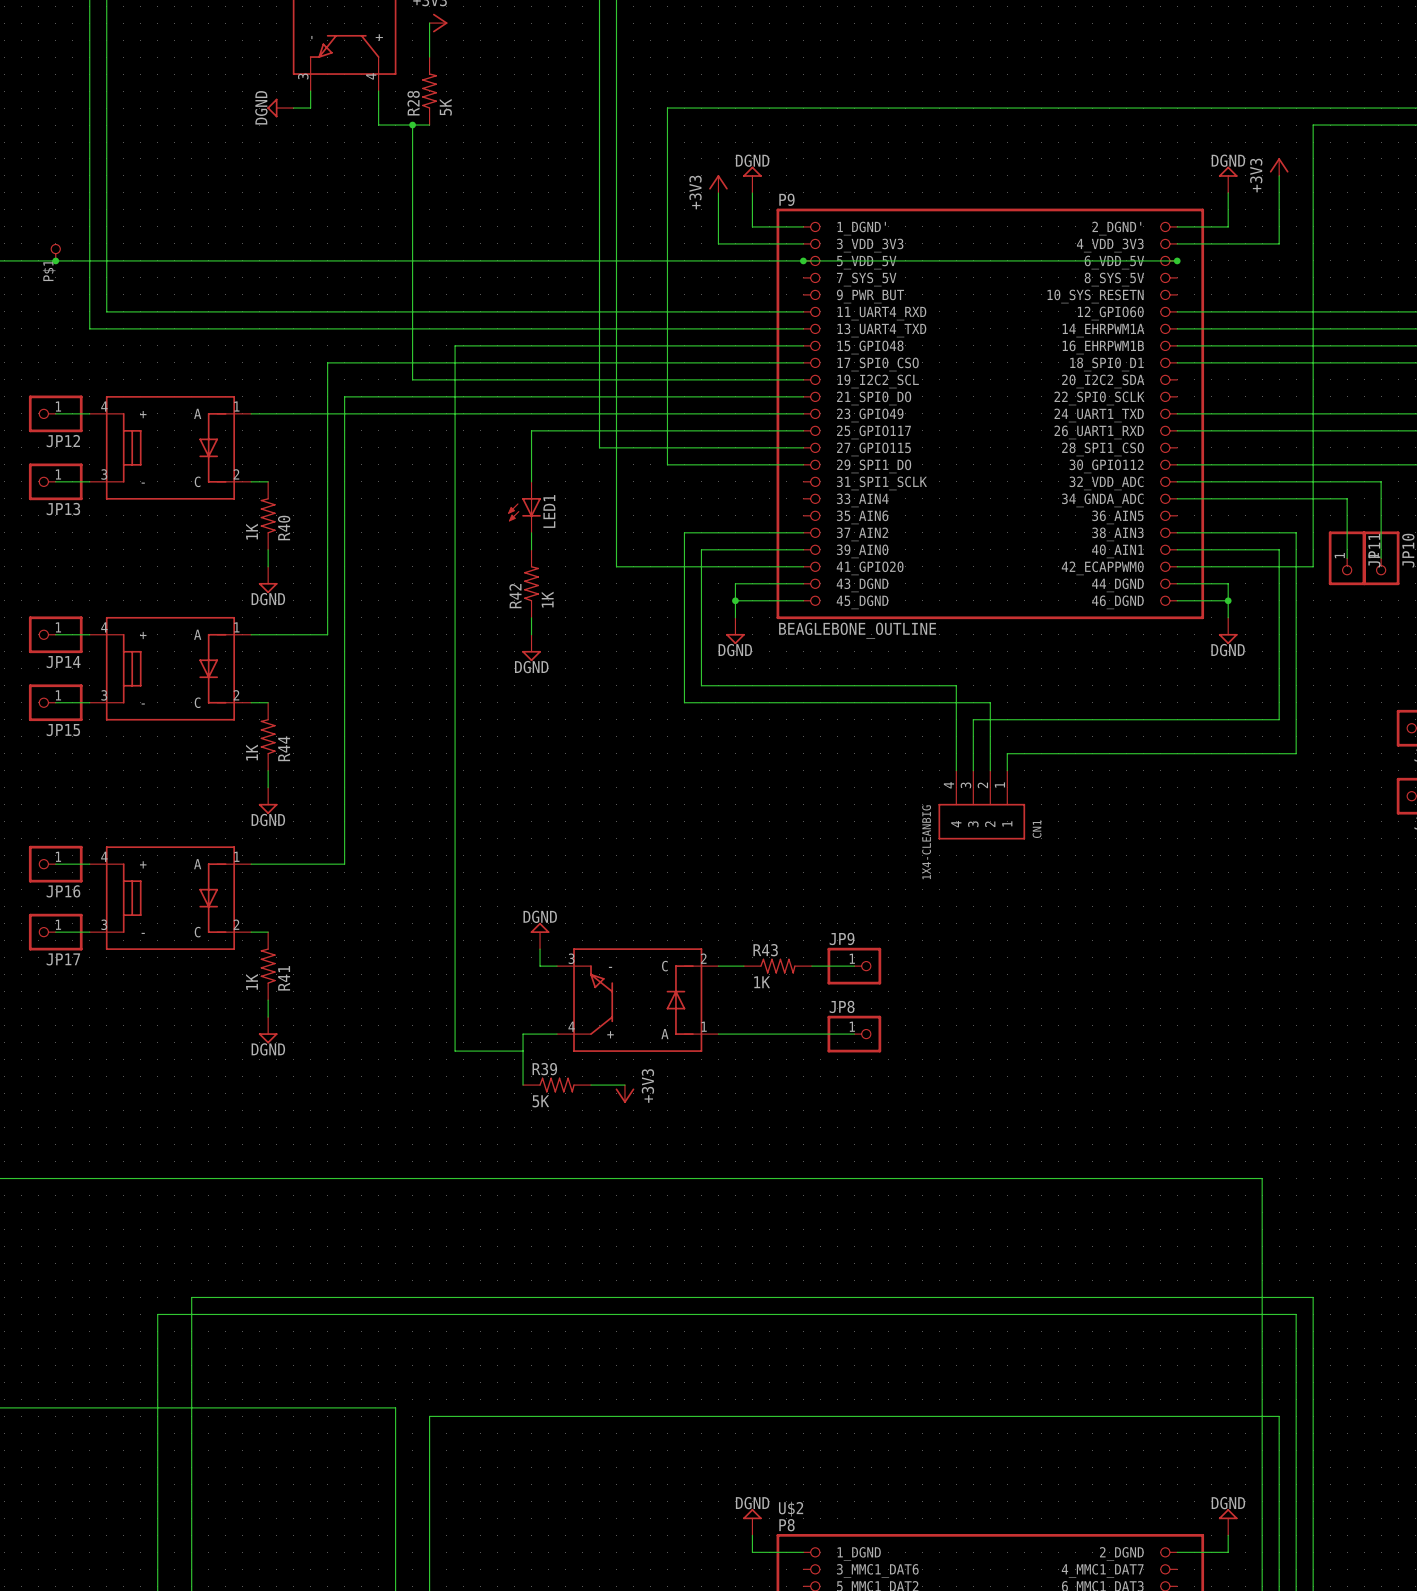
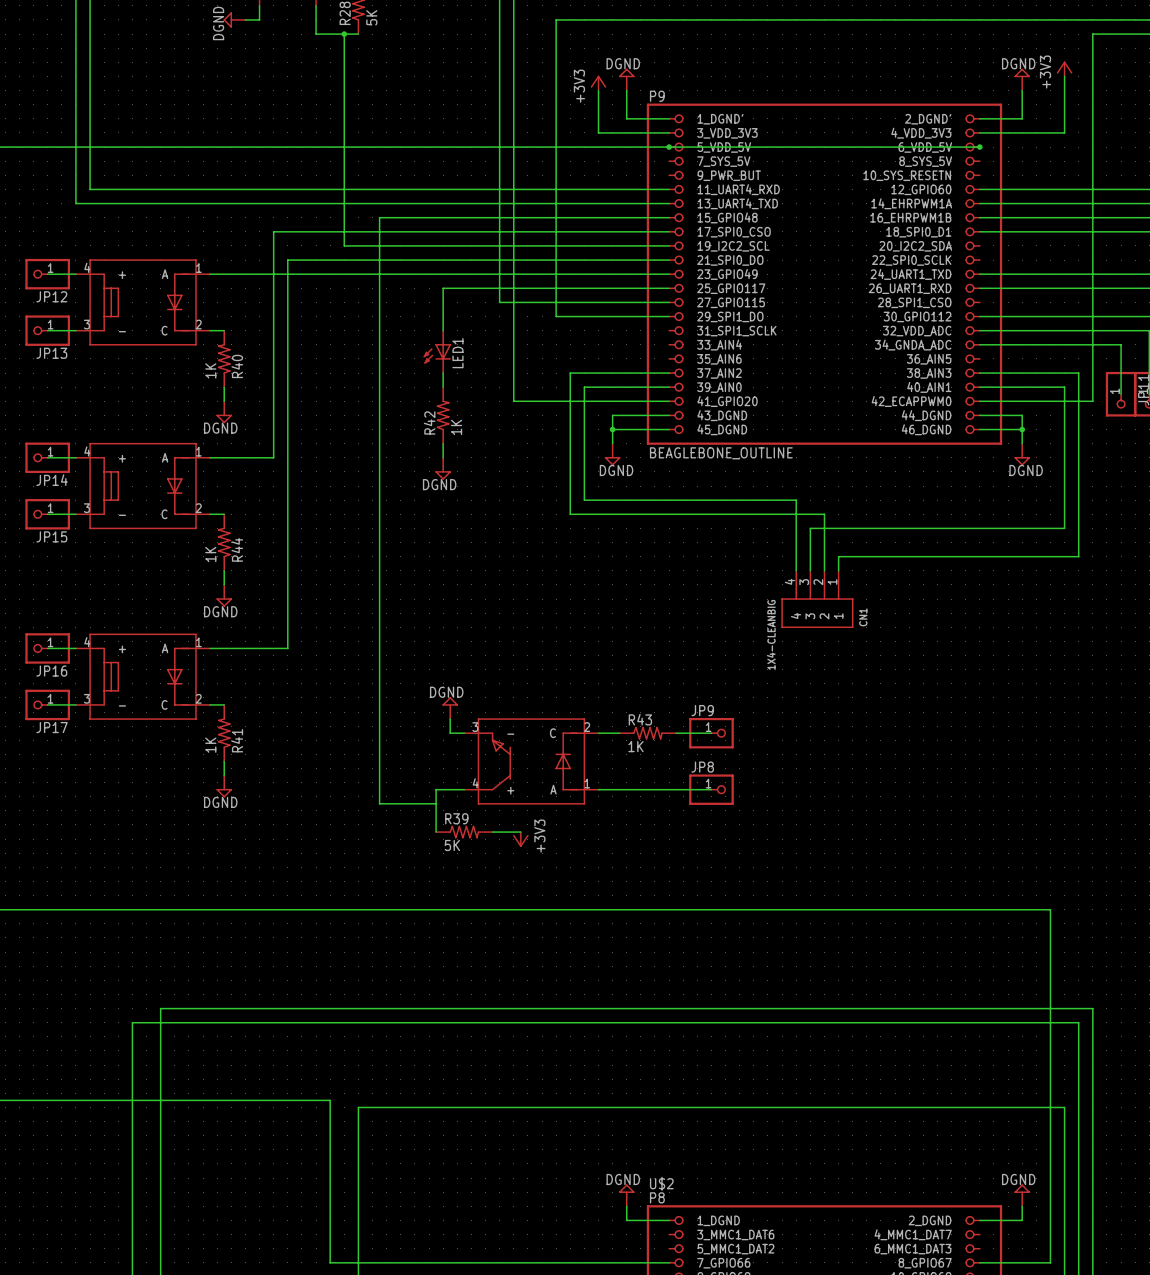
part: (55, 252) -> none
junction: (55, 260) -> none

